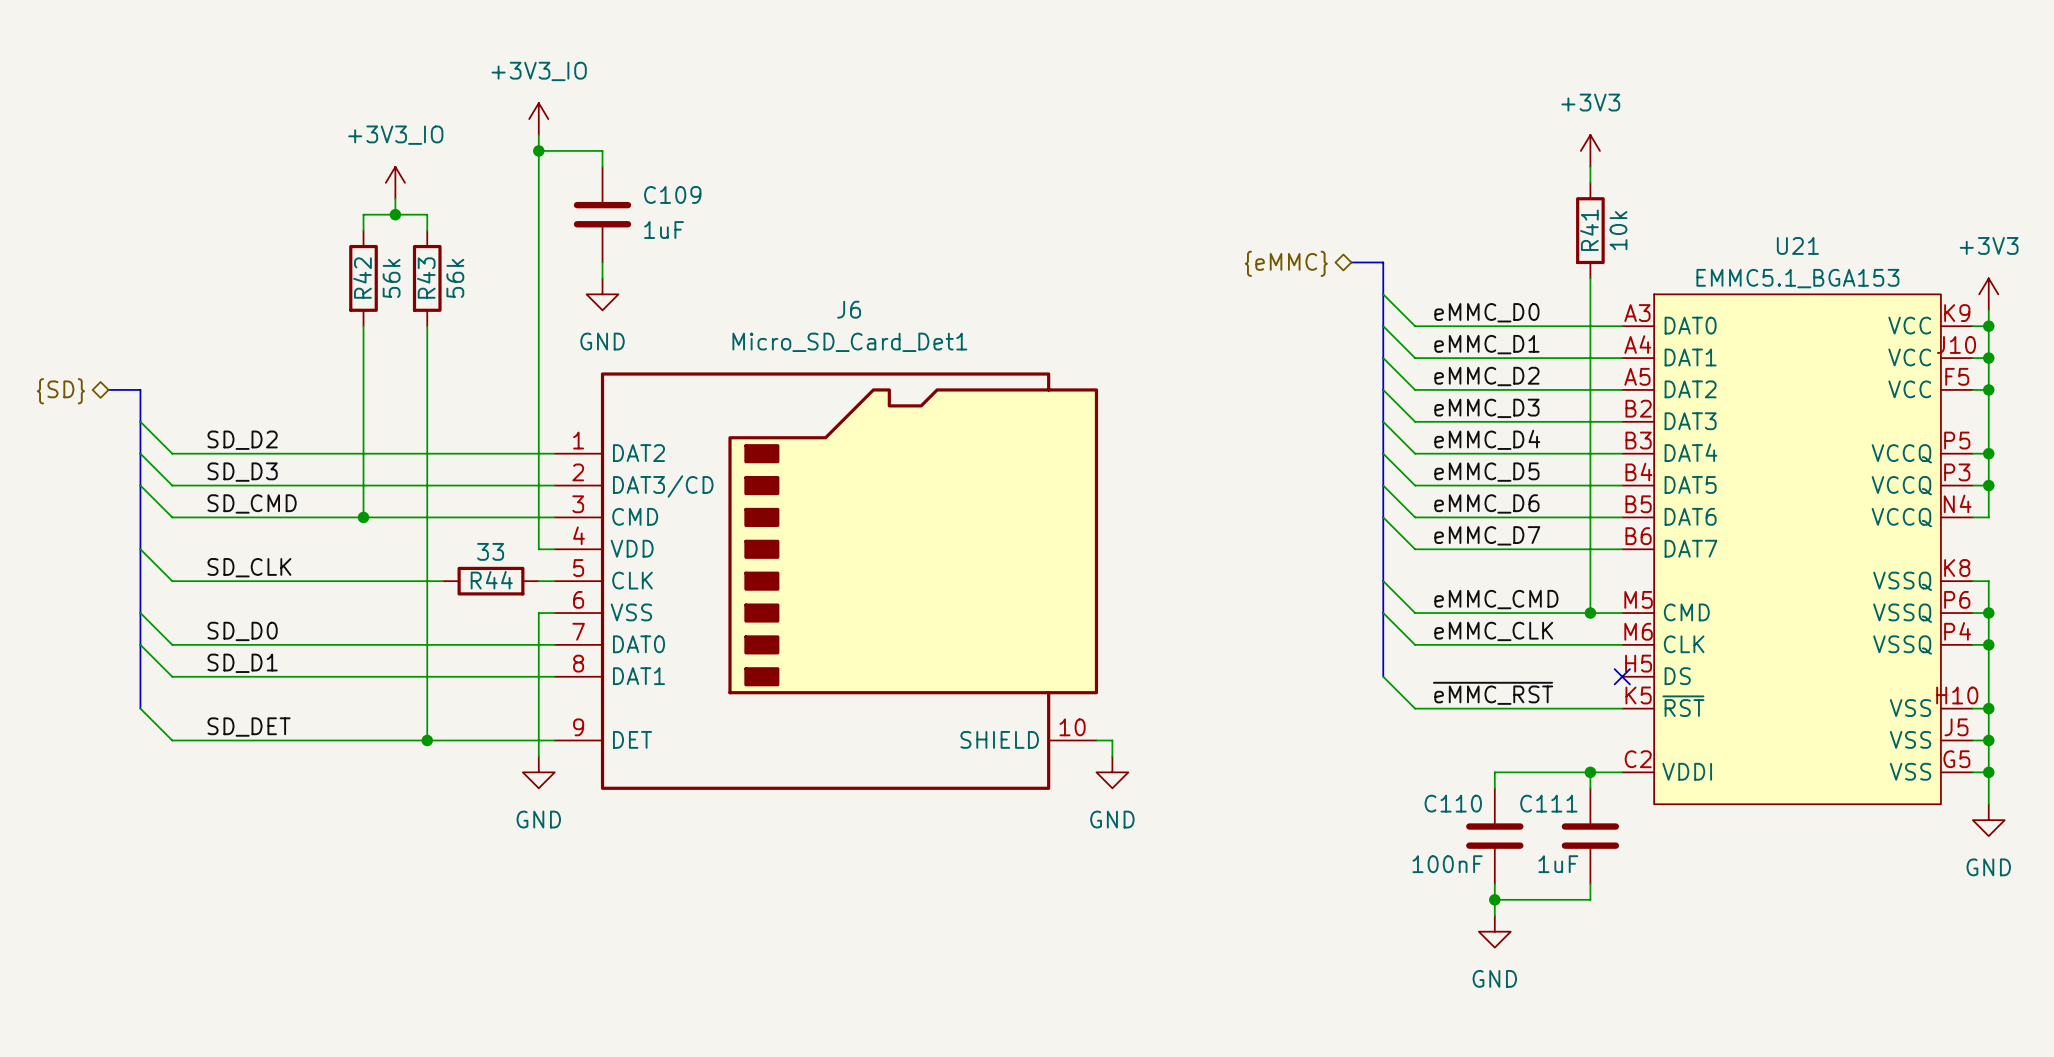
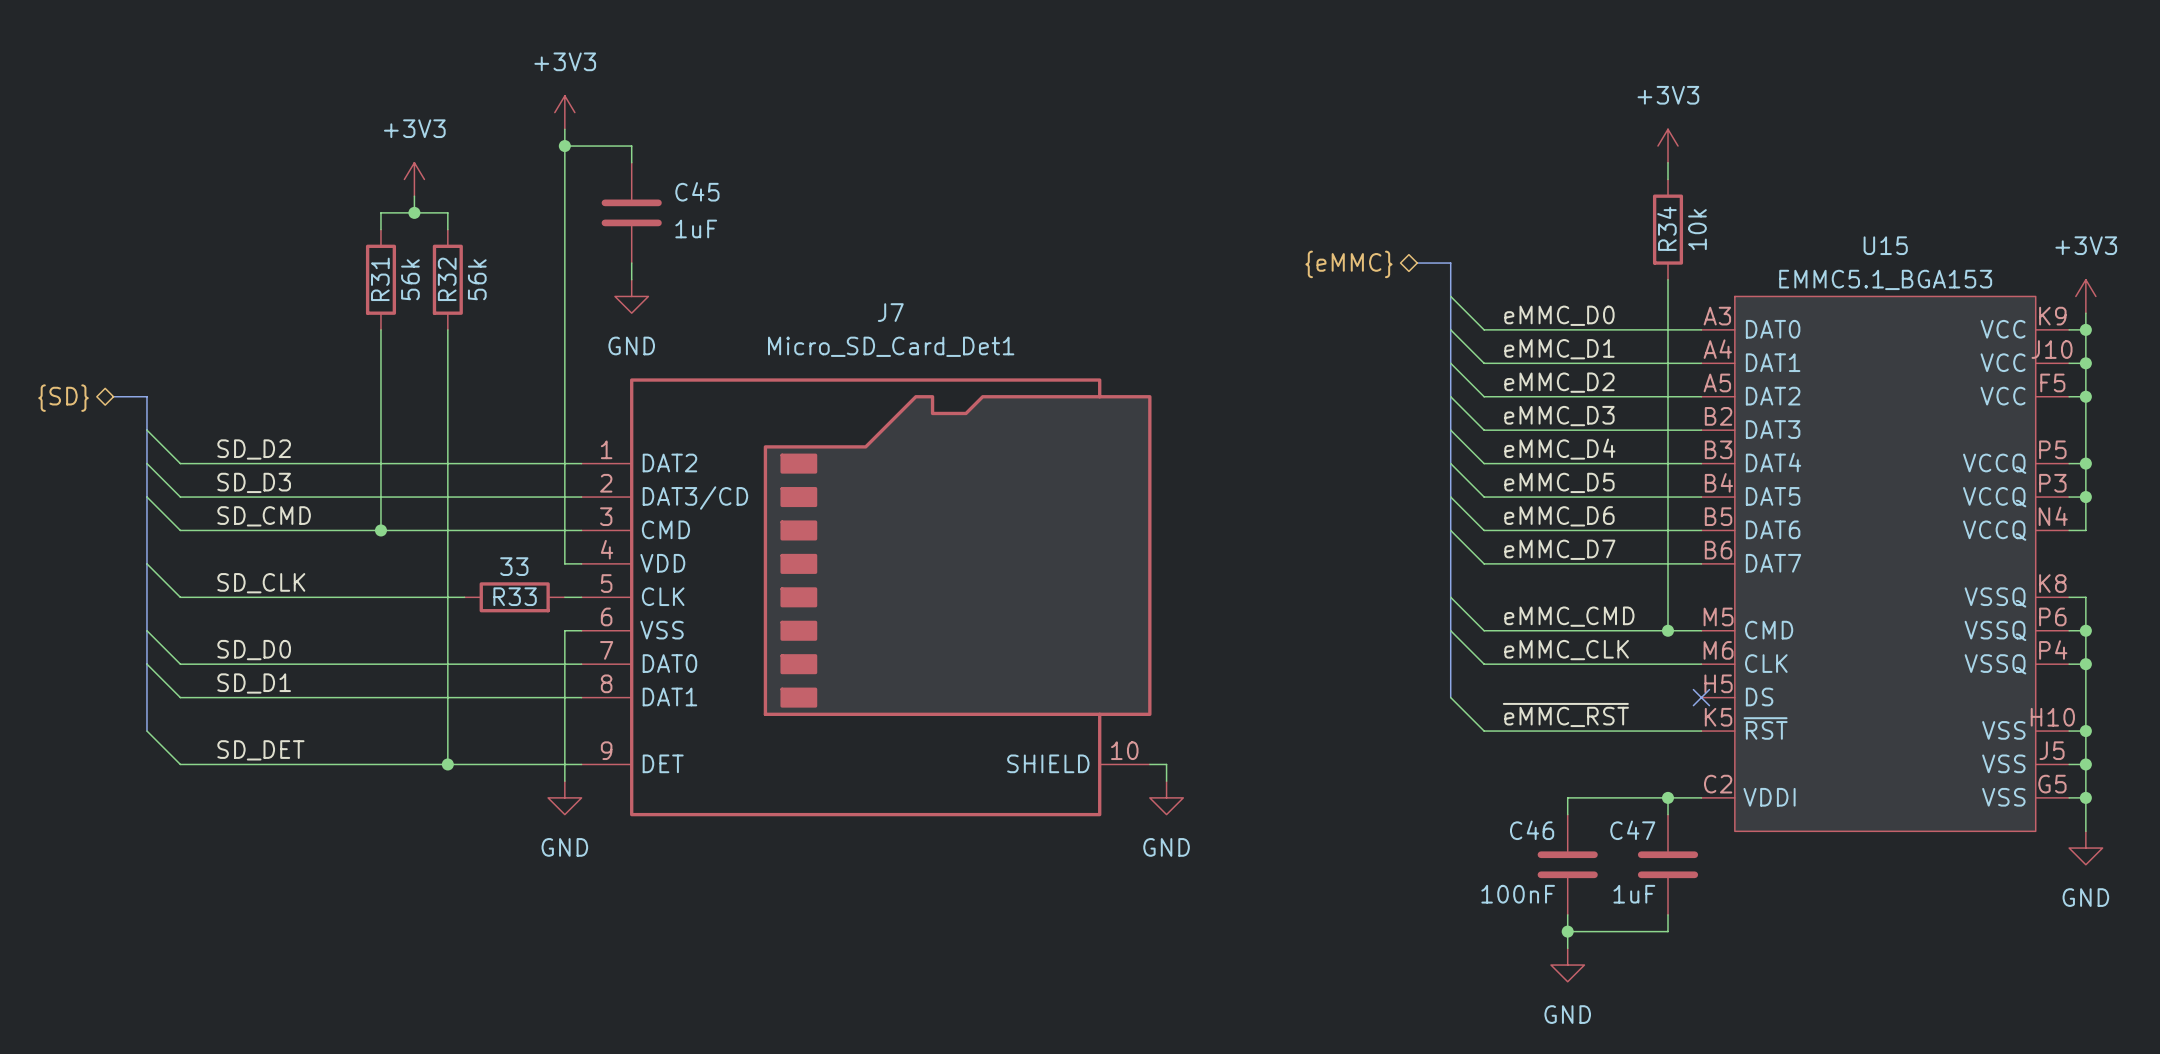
power symbol: +3V3_IO (538, 119) -> +3V3 (564, 112)
power symbol: +3V3_IO (395, 182) -> +3V3 (414, 179)
C109 name: C109 (672, 194) -> C45 (697, 191)
R41 name: R41 (1589, 230) -> R34 (1666, 228)
U21 name: U21 (1797, 245) -> U15 (1885, 245)
R42 name: R42 (362, 278) -> R31 (380, 279)
R43 name: R43 (426, 278) -> R32 (447, 279)
J6 name: J6 (849, 309) -> J7 (890, 312)
R44 name: R44 (491, 580) -> R33 (515, 596)
C110 name: C110 (1453, 803) -> C46 (1532, 830)
C111 name: C111 (1548, 803) -> C47 (1632, 830)

